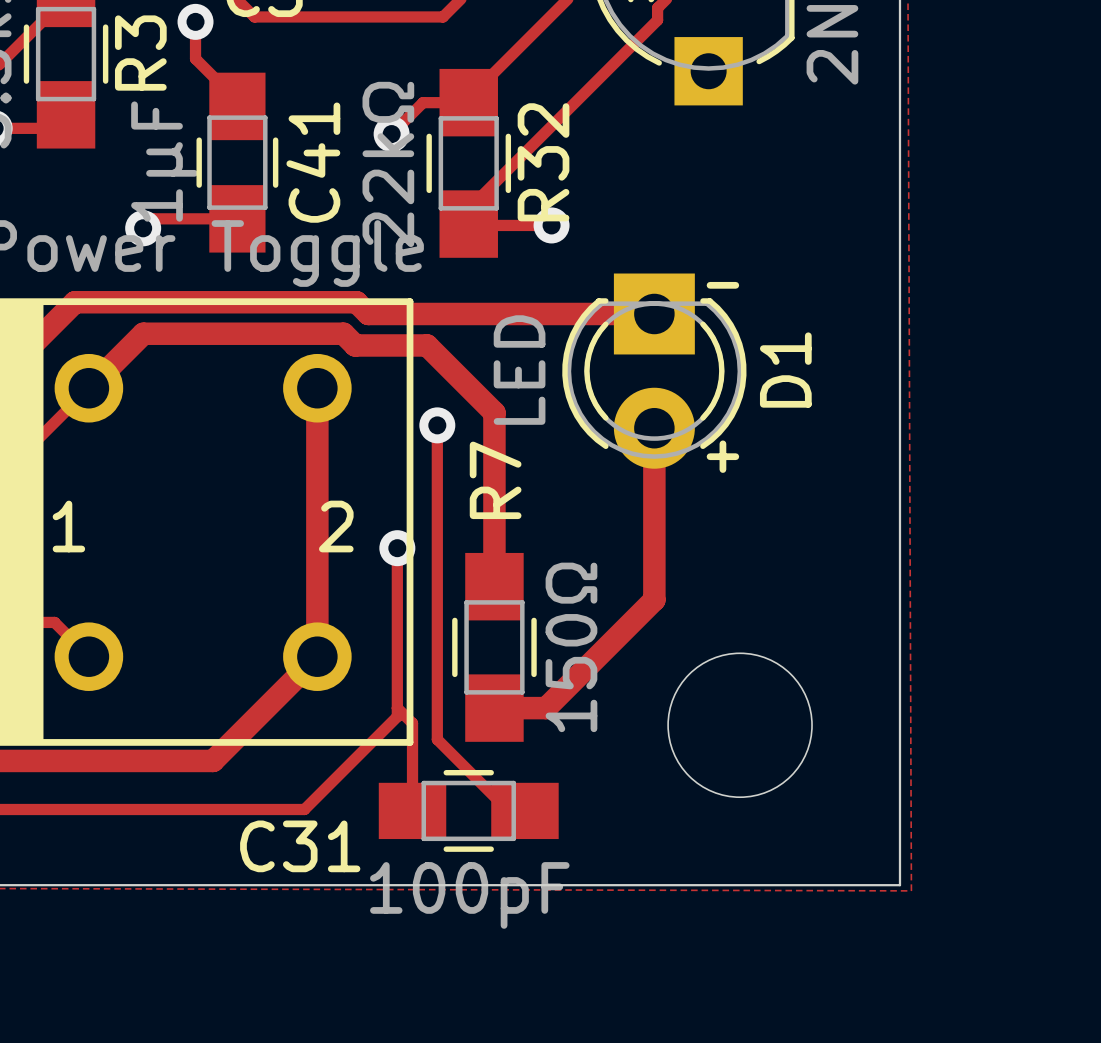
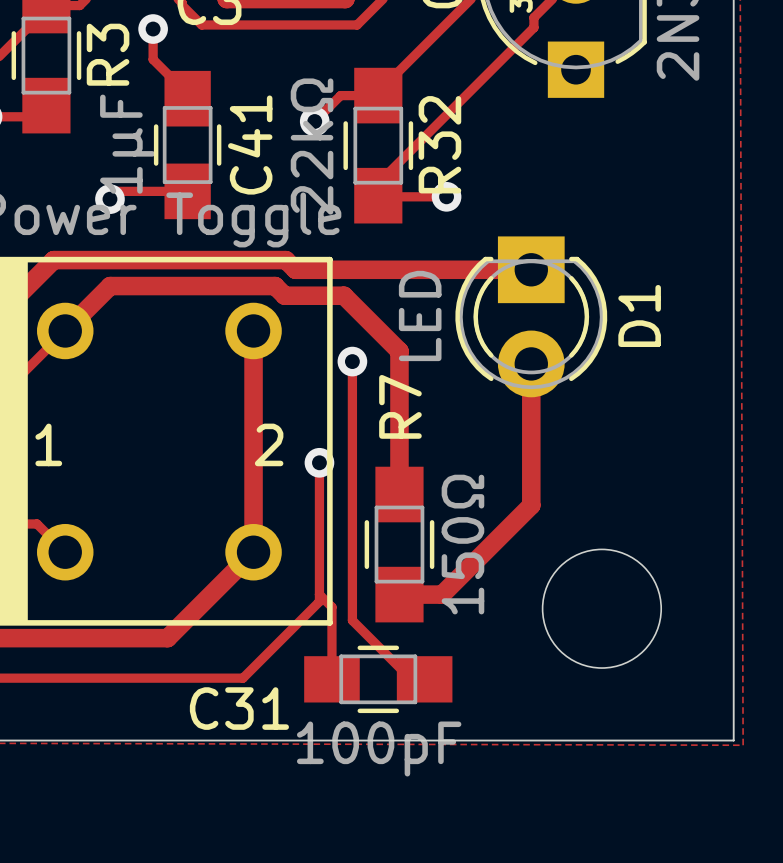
text: - (722, 285) -> none
text: + (722, 456) -> none

